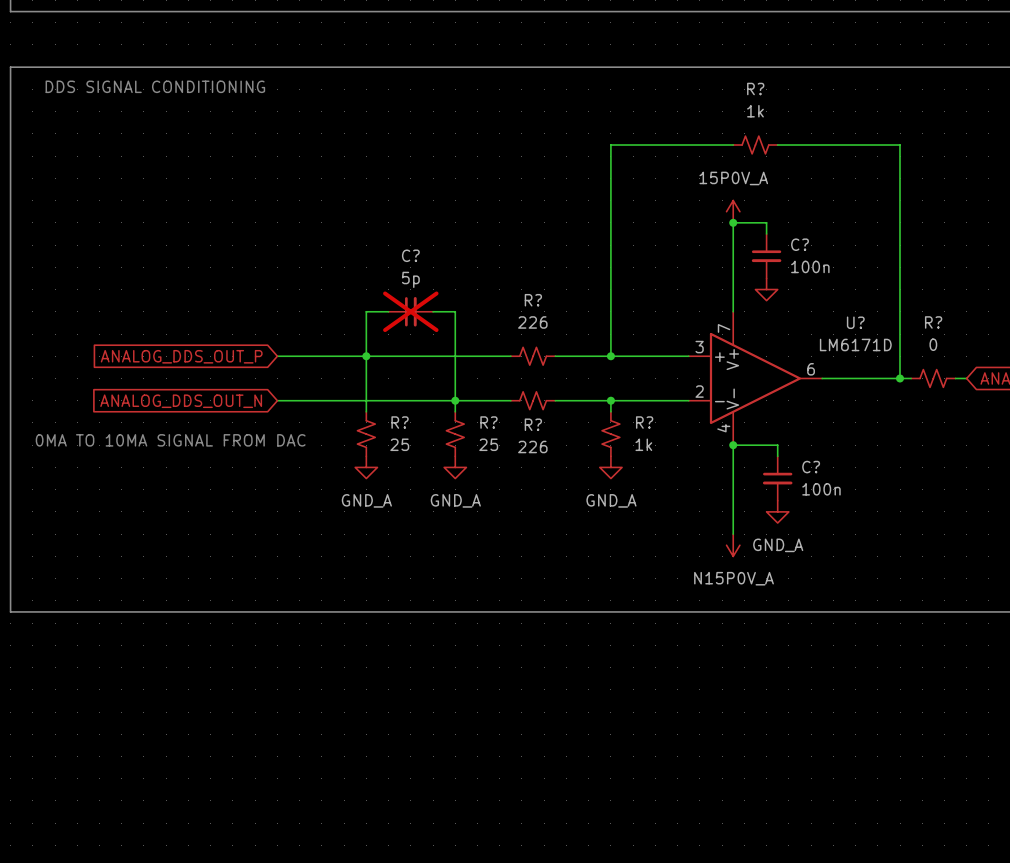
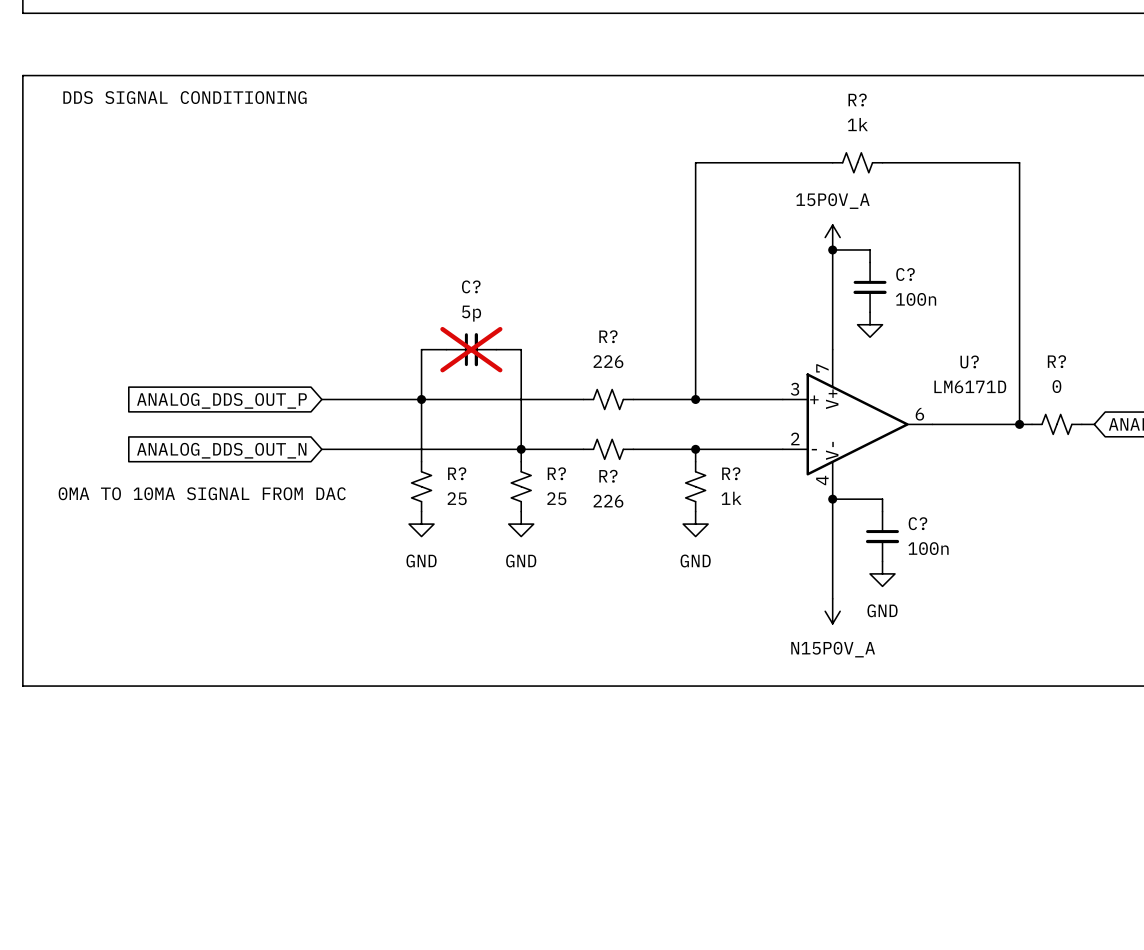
power symbol: GND_A (366, 467) -> GND (421, 524)
power symbol: GND_A (455, 467) -> GND (521, 524)
power symbol: GND_A (610, 467) -> GND (695, 524)
power symbol: GND_A (777, 511) -> GND (882, 573)

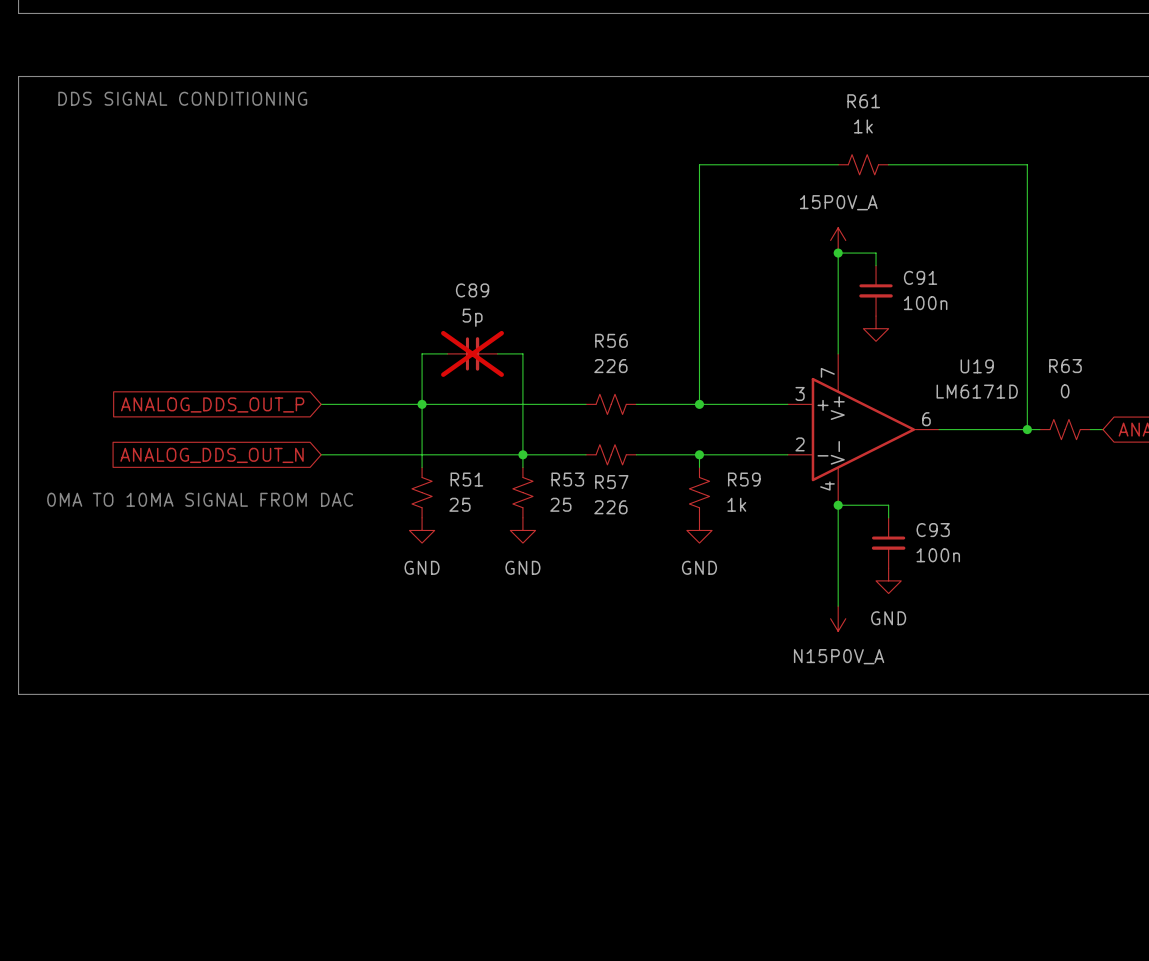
R? name: R? (857, 99) -> R61 (863, 101)
C? name: C? (905, 274) -> C91 (920, 277)
C? name: C? (471, 286) -> C89 (472, 290)
R? name: R? (608, 336) -> R56 (611, 340)
U? name: U? (969, 361) -> U19 (977, 366)
R? name: R? (1056, 361) -> R63 (1065, 366)
R? name: R? (457, 473) -> R51 (466, 479)
R? name: R? (556, 473) -> R53 (567, 479)
R? name: R? (731, 473) -> R59 (744, 479)
R? name: R? (608, 476) -> R57 (611, 482)
C? name: C? (917, 523) -> C93 (933, 530)

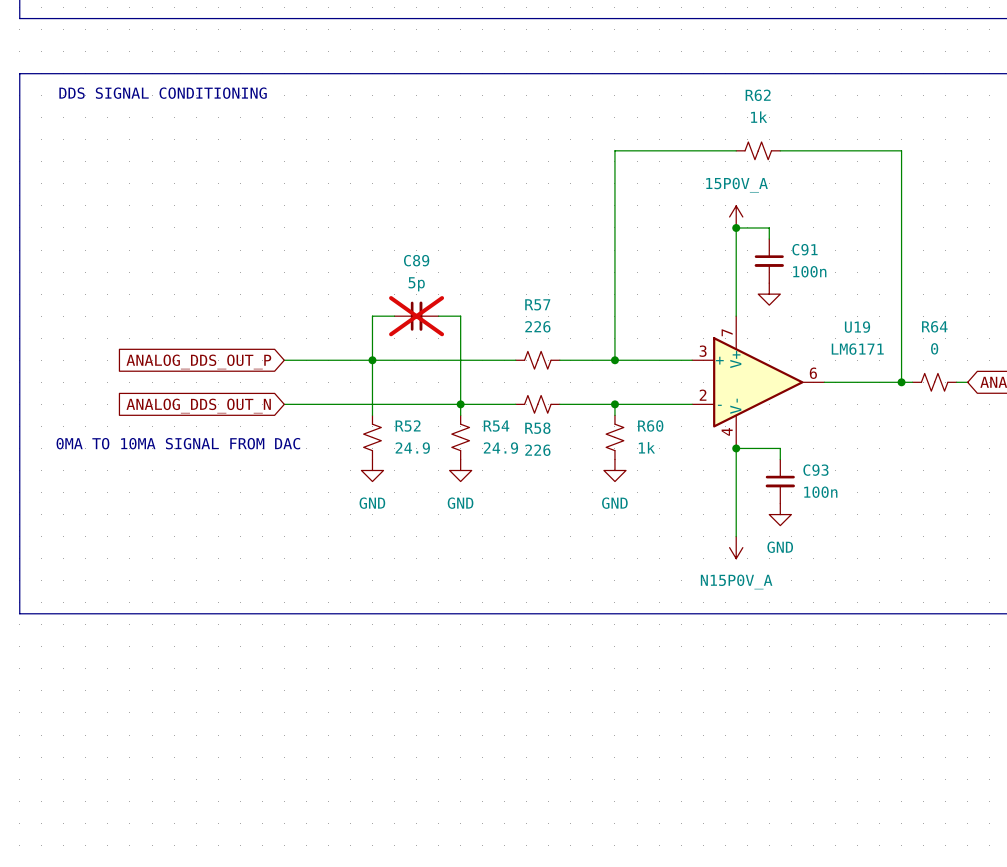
R61 name: R61 (863, 101) -> R62 (758, 95)
R56 name: R56 (611, 340) -> R57 (537, 304)
R63 name: R63 (1065, 366) -> R64 (934, 326)
U19 value: LM6171D (977, 391) -> LM6171 (857, 349)
R51 name: R51 (466, 479) -> R52 (408, 426)
R53 name: R53 (567, 479) -> R54 (496, 426)
R59 name: R59 (744, 479) -> R60 (650, 426)
R57 name: R57 (611, 482) -> R58 (537, 428)
R51 value: 25 (459, 504) -> 24.9 (412, 448)
R53 value: 25 (560, 504) -> 24.9 (500, 448)

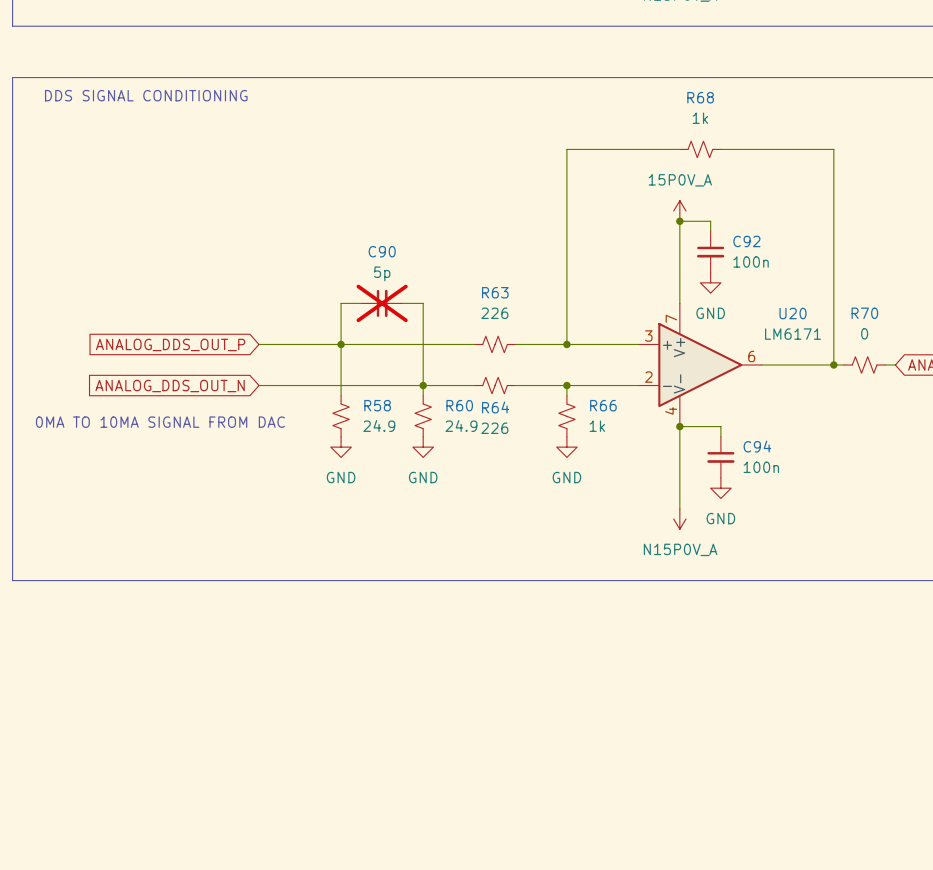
R62 name: R62 (758, 95) -> R68 (700, 97)
C91 name: C91 (804, 249) -> C92 (746, 241)
C89 name: C89 (416, 260) -> C90 (382, 251)
R57 name: R57 (537, 304) -> R63 (495, 292)
power symbol text: none -> GND (710, 313)
R64 name: R64 (934, 326) -> R70 (864, 313)
U19 name: U19 (857, 327) -> U20 (793, 313)
R52 name: R52 (408, 426) -> R58 (377, 405)
R54 name: R54 (496, 426) -> R60 (459, 405)
R60 name: R60 (650, 426) -> R66 (603, 405)
R58 name: R58 (537, 428) -> R64 (495, 407)
C93 name: C93 (815, 470) -> C94 (757, 446)

